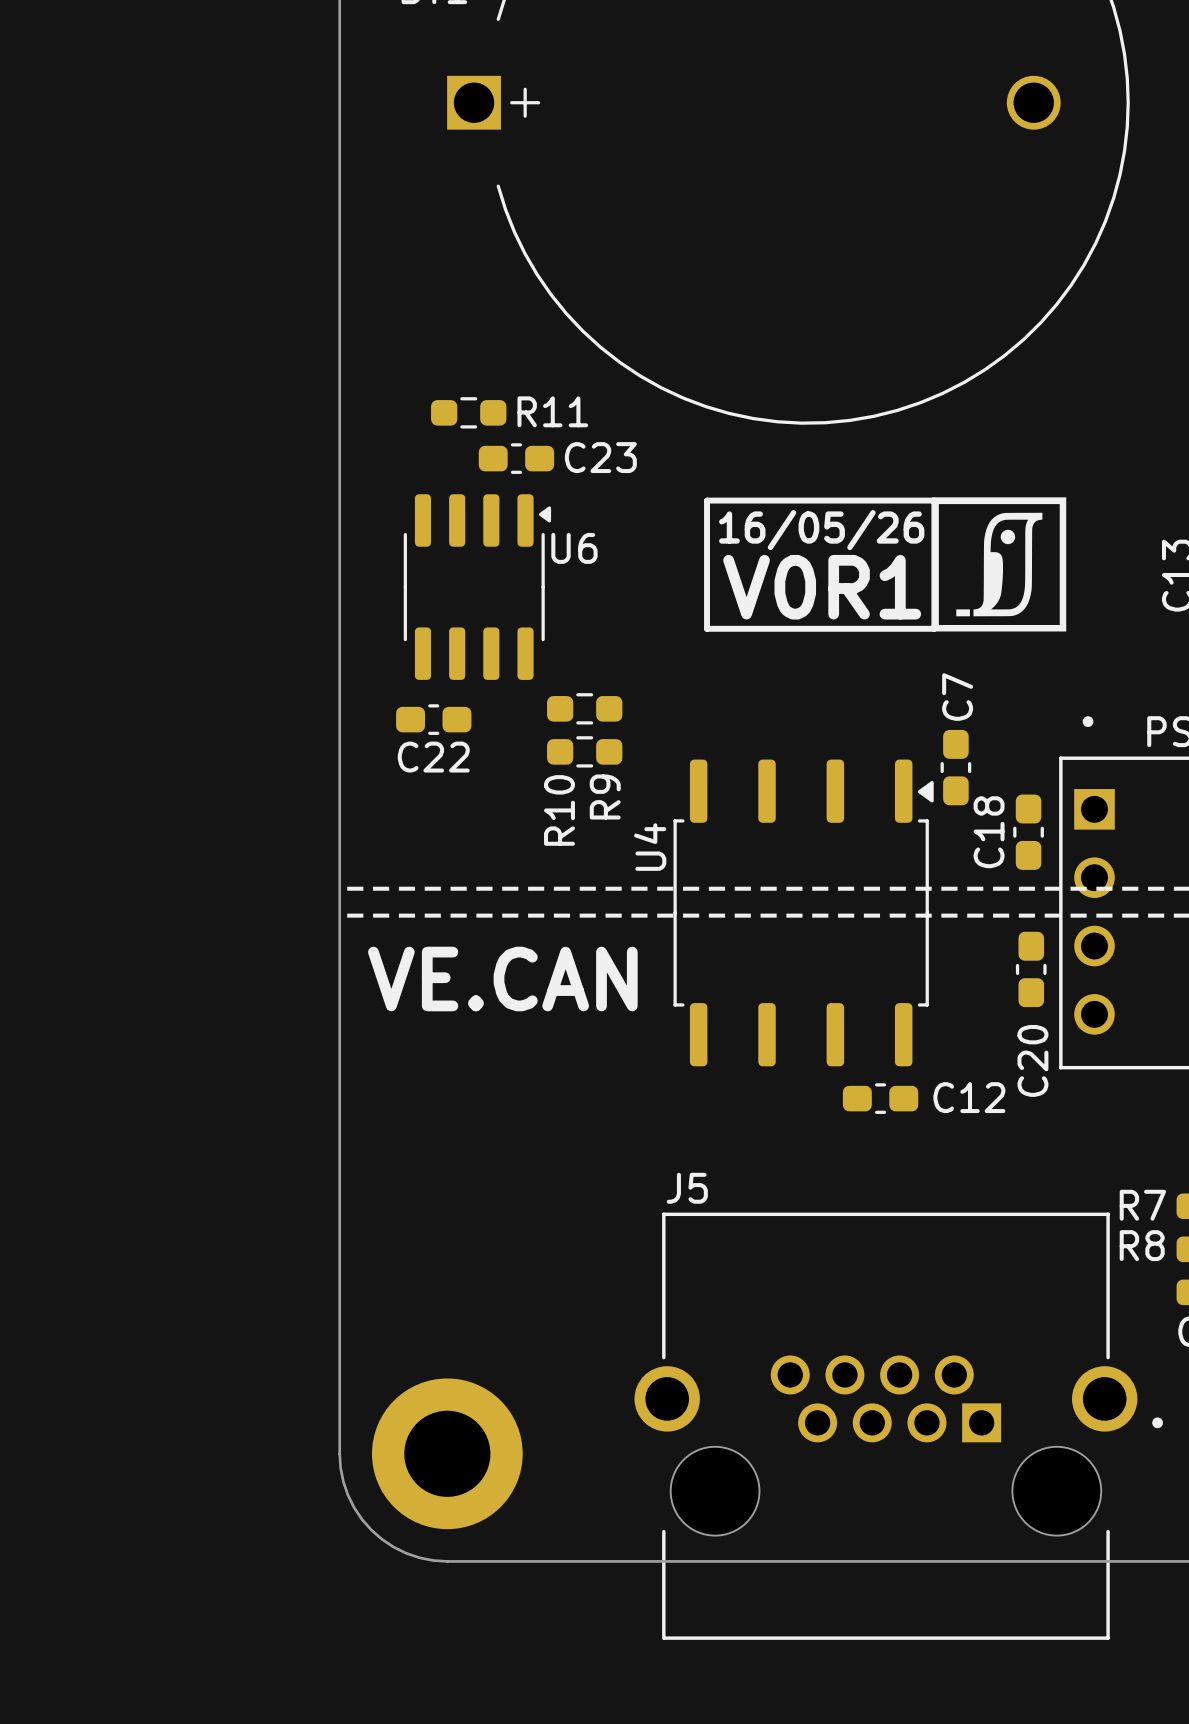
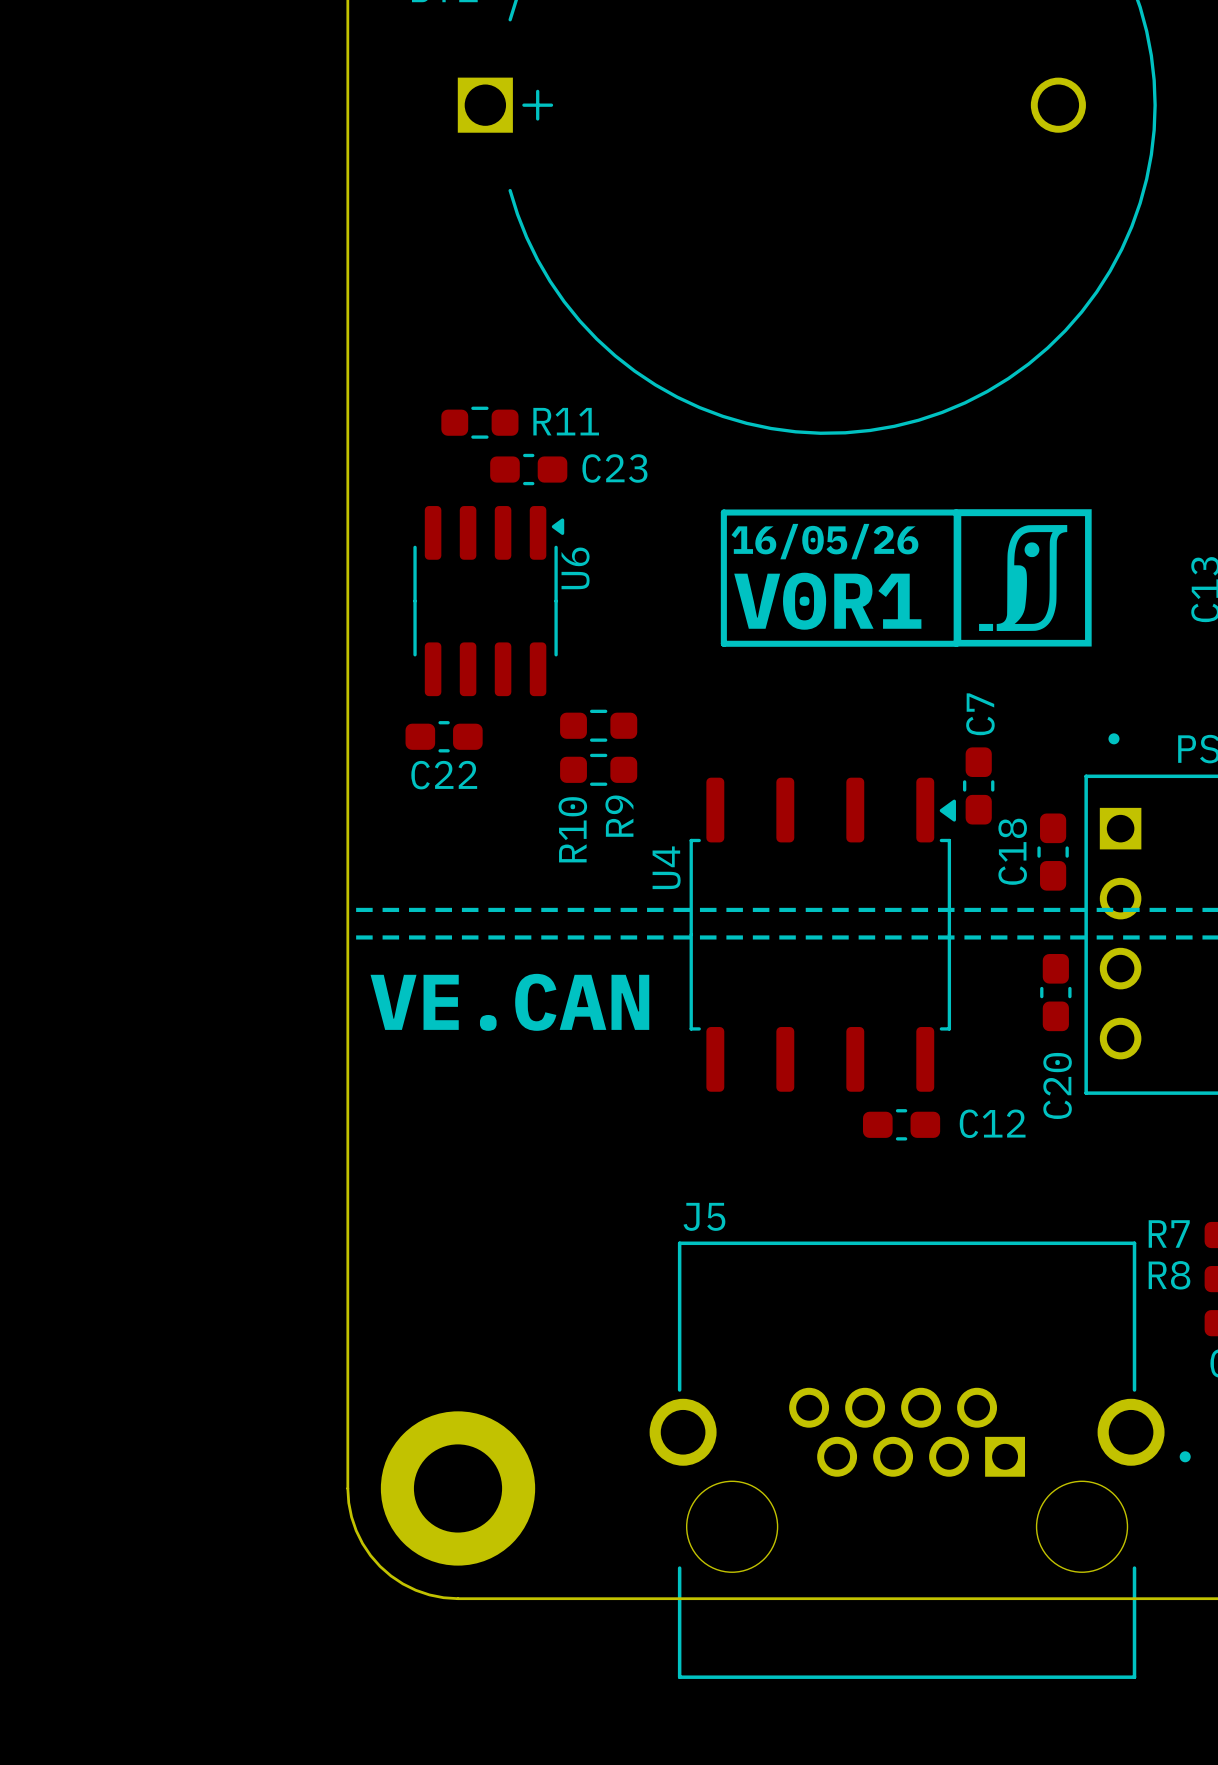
U6 name rotation: 0° (574, 548) -> 90° counterclockwise (575, 568)

